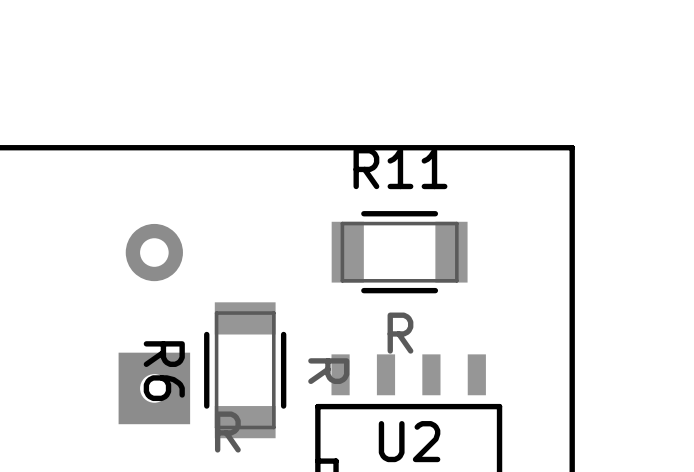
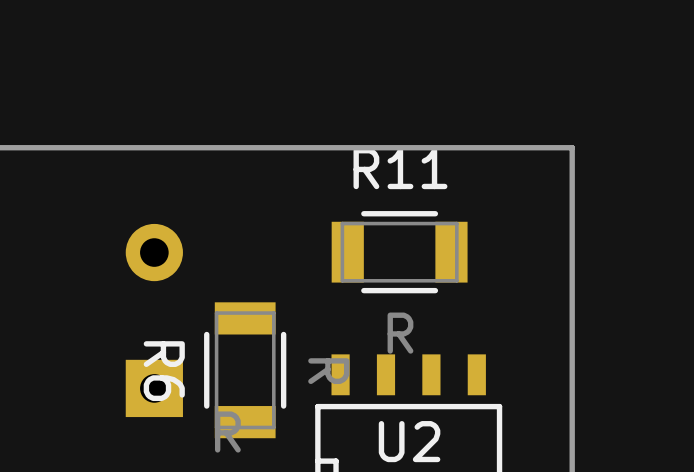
part footprint: [118, 223, 191, 425] -> [125, 223, 183, 418]

